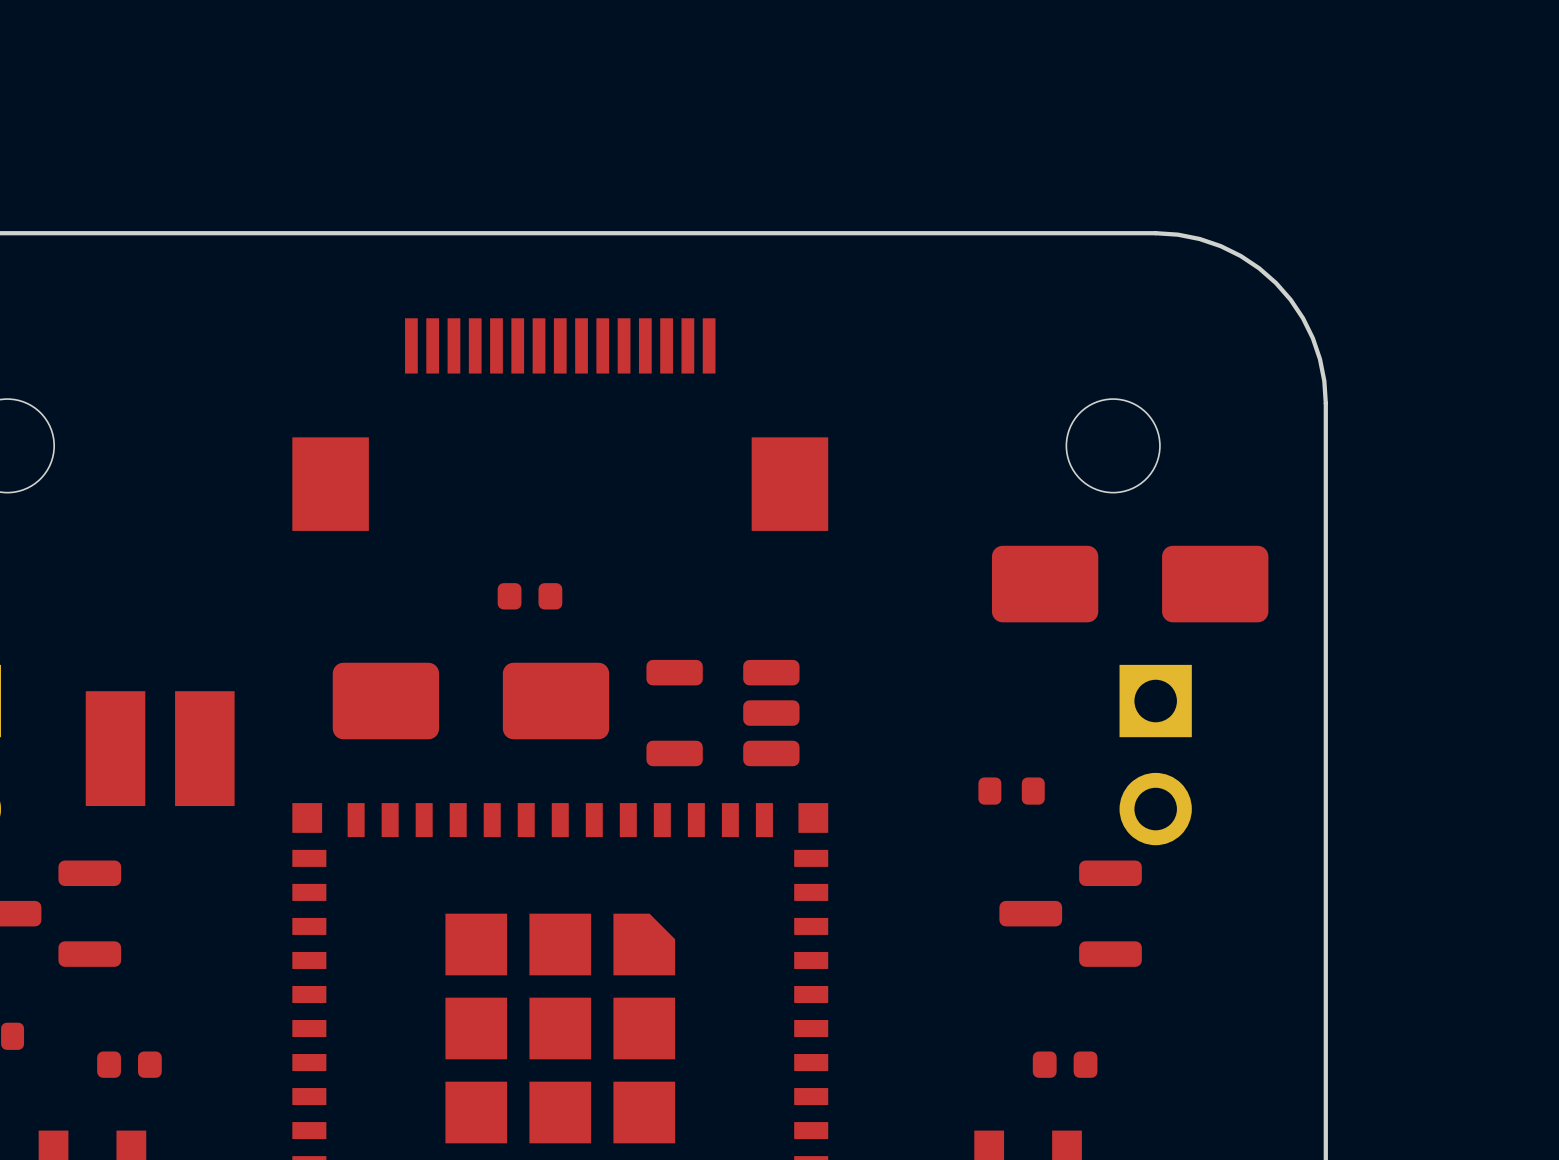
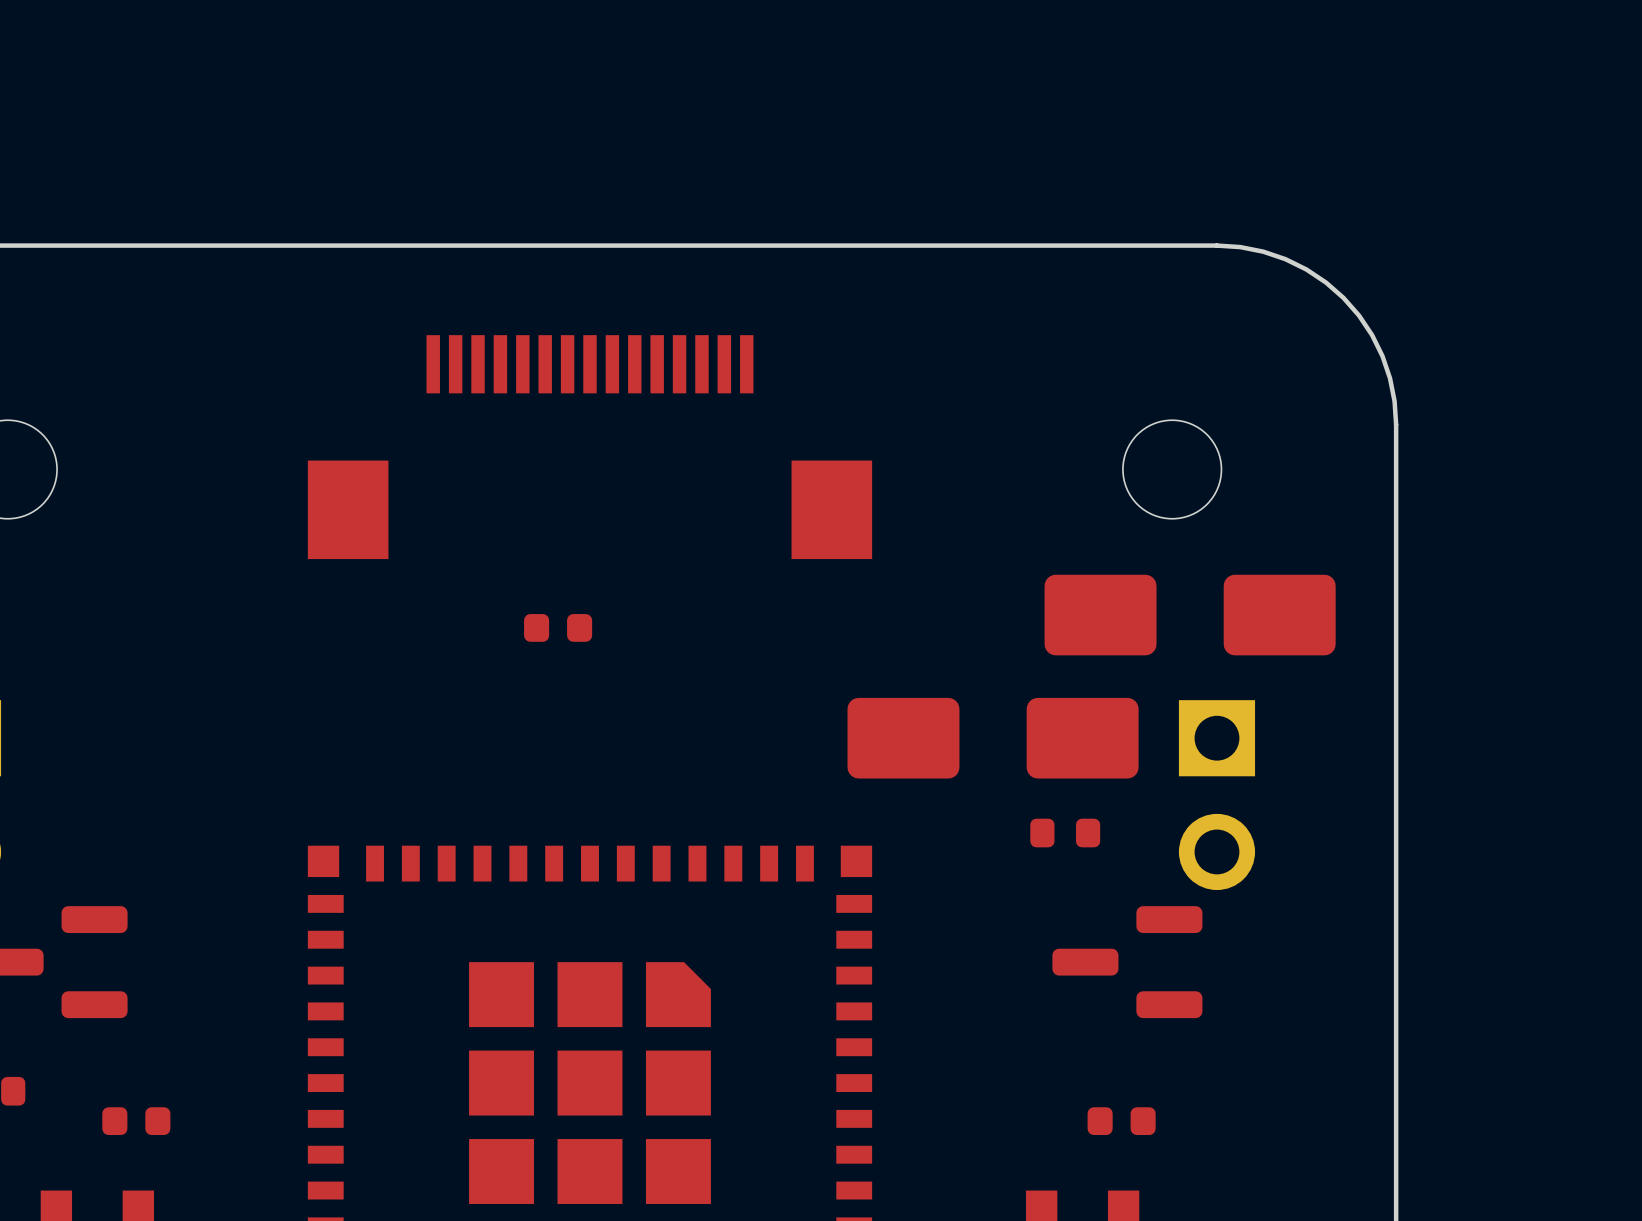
part position: (470, 701) -> (993, 738)
part: (722, 713) -> none
part: (160, 748) -> none

